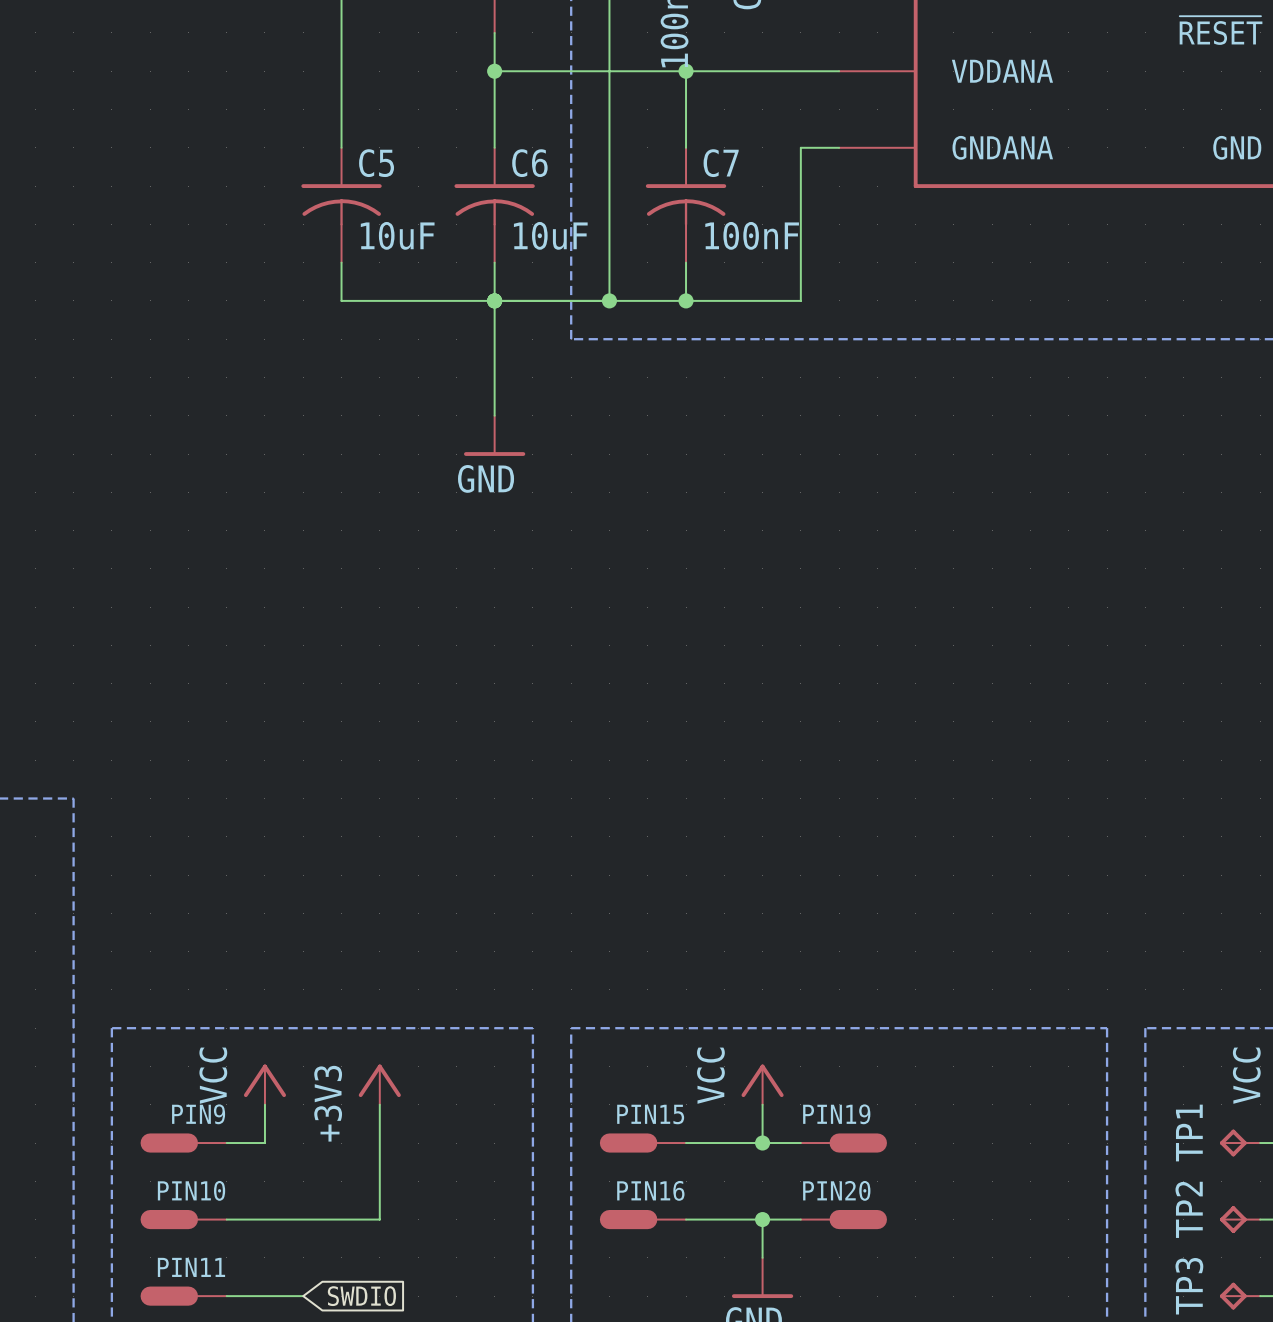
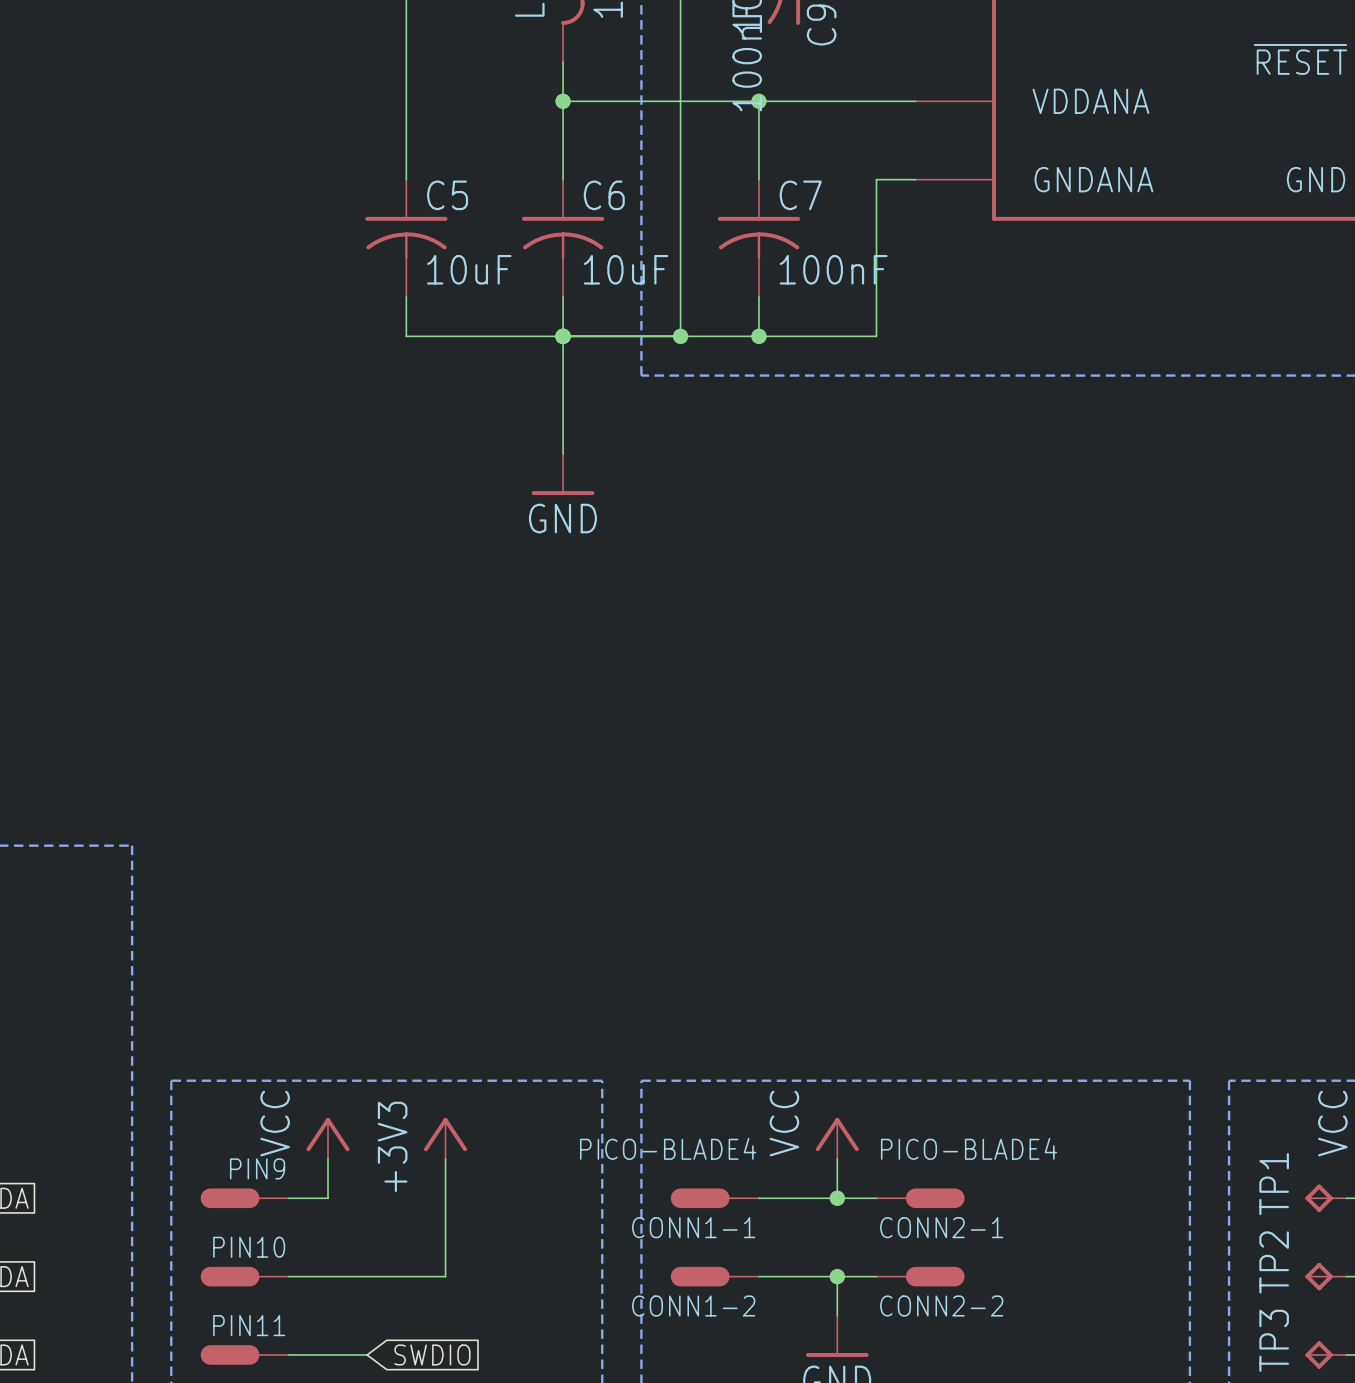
PIN15 value: none -> PICO-BLADE4 (668, 1148)
PIN19 value: none -> PICO-BLADE4 (969, 1148)
PIN15 name: PIN15 (650, 1114) -> CONN1-1 (693, 1227)
PIN19 name: PIN19 (836, 1114) -> CONN2-1 (941, 1227)
PIN16 name: PIN16 (650, 1190) -> CONN1-2 (693, 1306)
PIN20 name: PIN20 (836, 1190) -> CONN2-2 (941, 1306)

